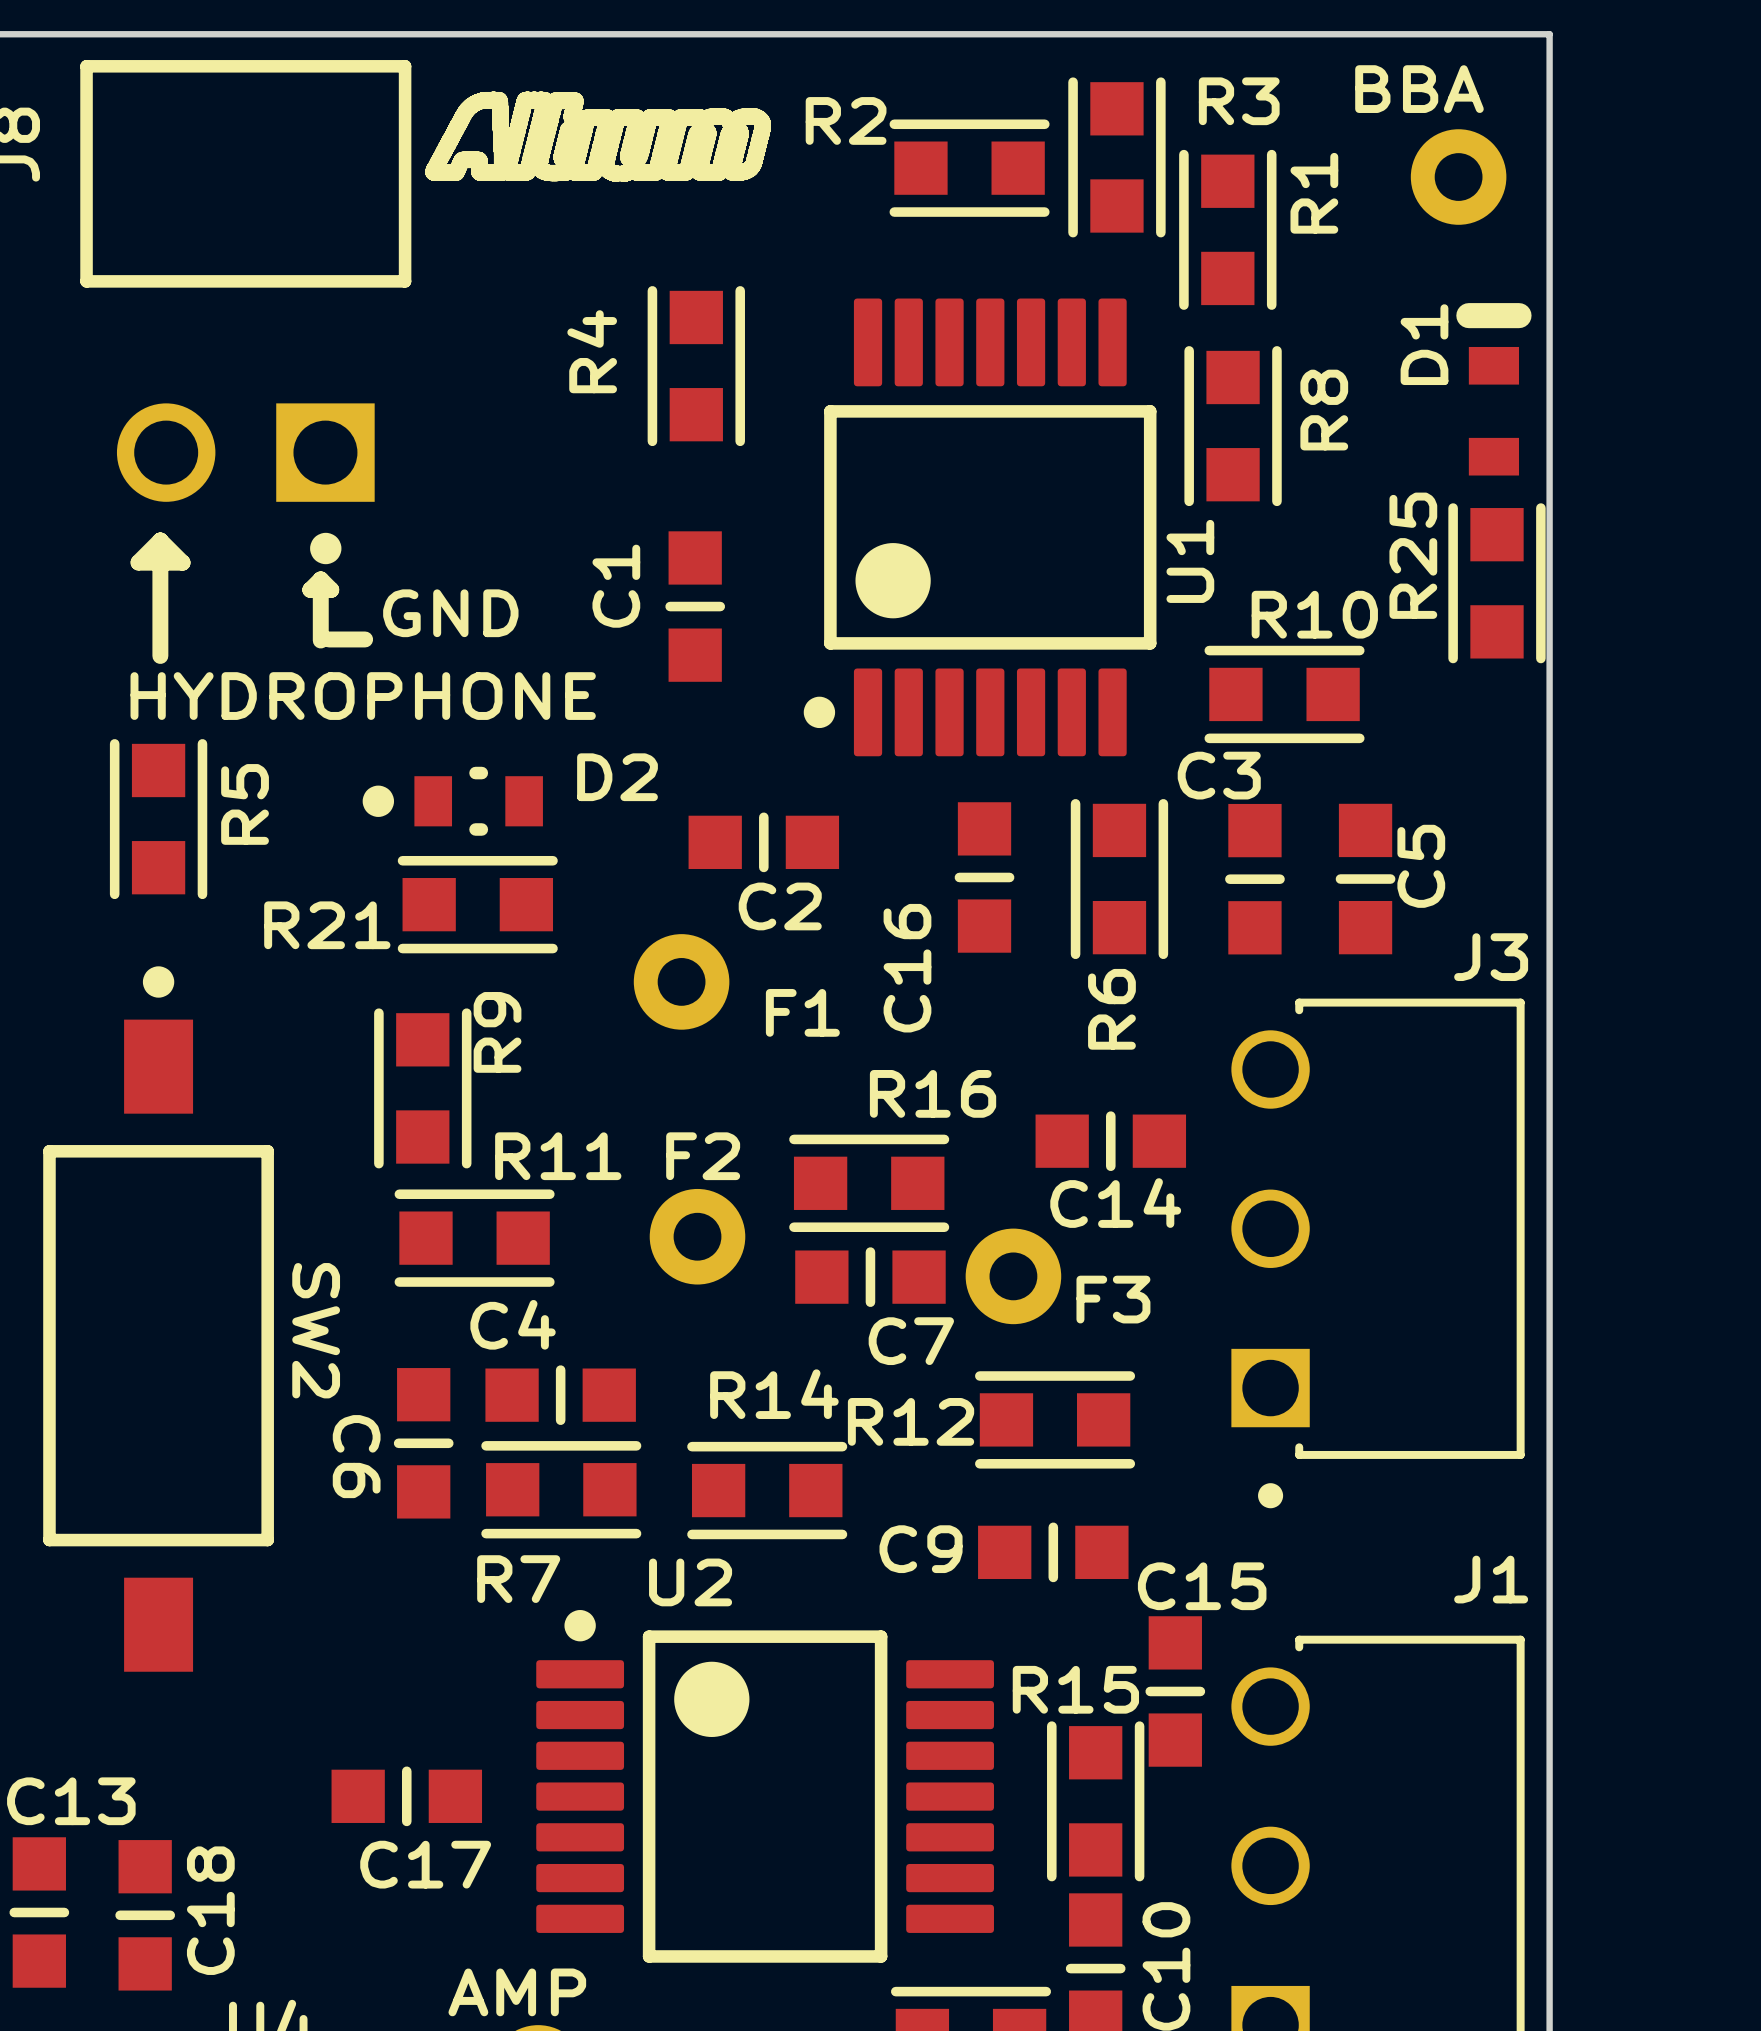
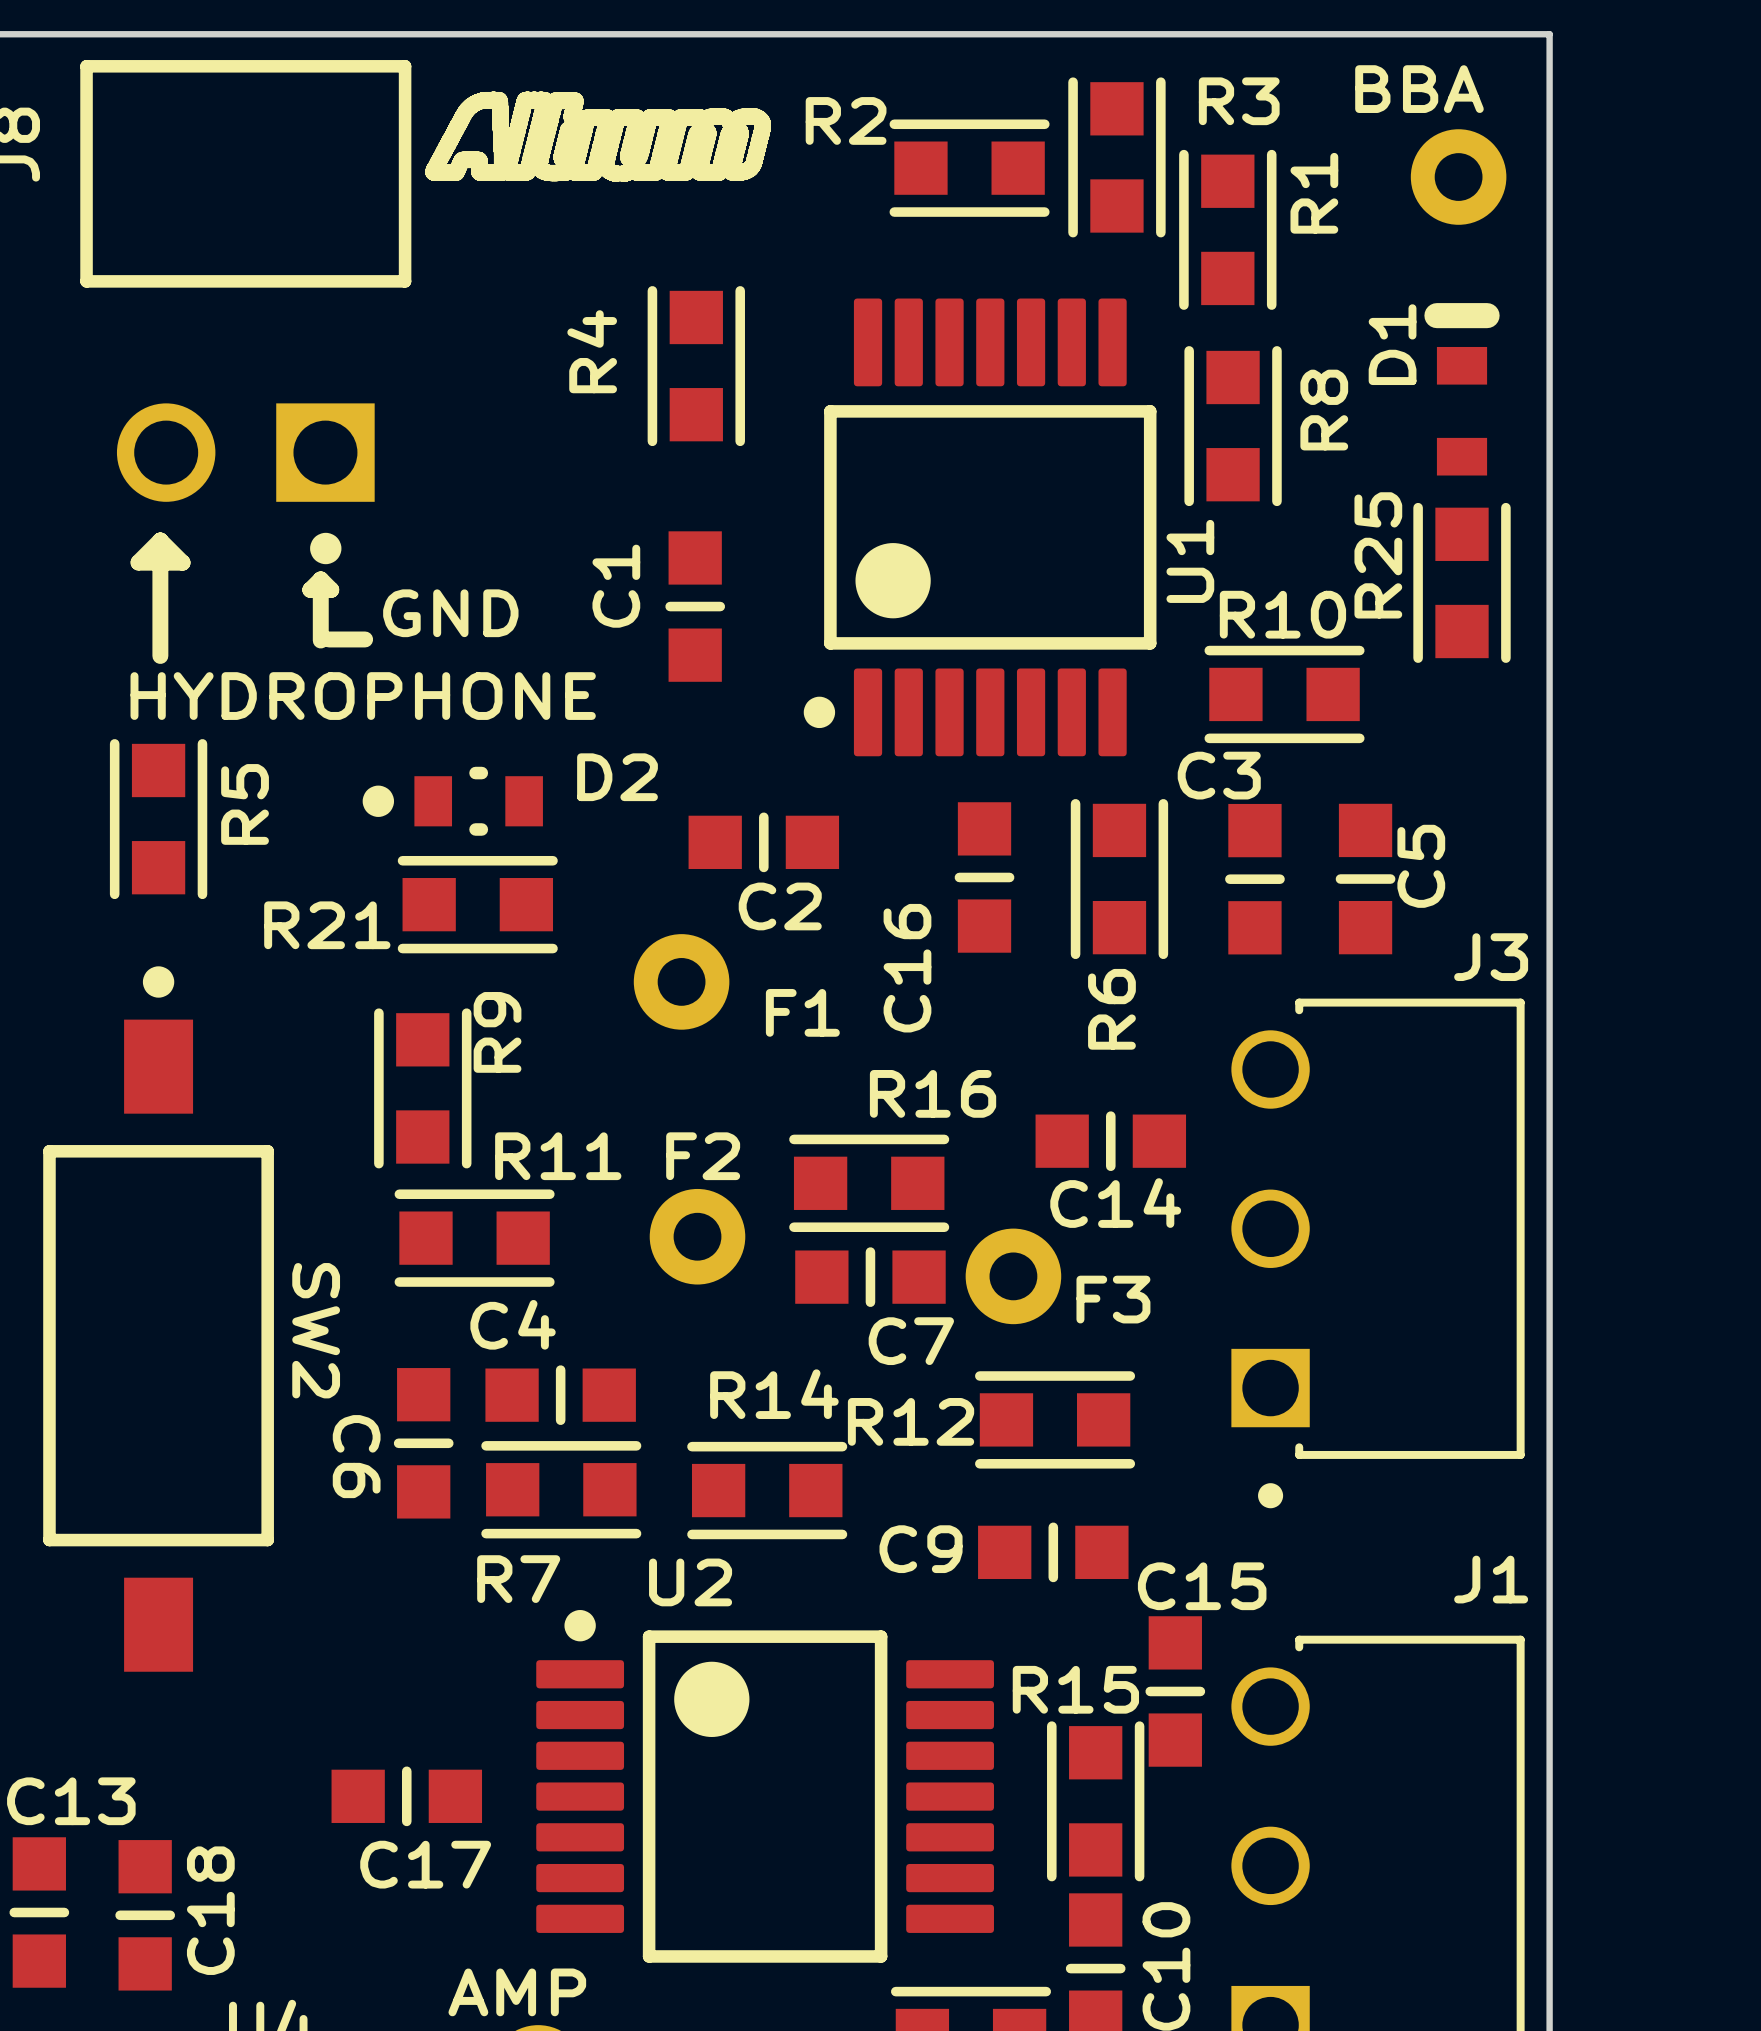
D1 position: (1493, 389) -> (1462, 389)
R25 position: (1497, 583) -> (1462, 582)
R10 name position: R10 (1314, 614) -> R10 (1282, 614)

